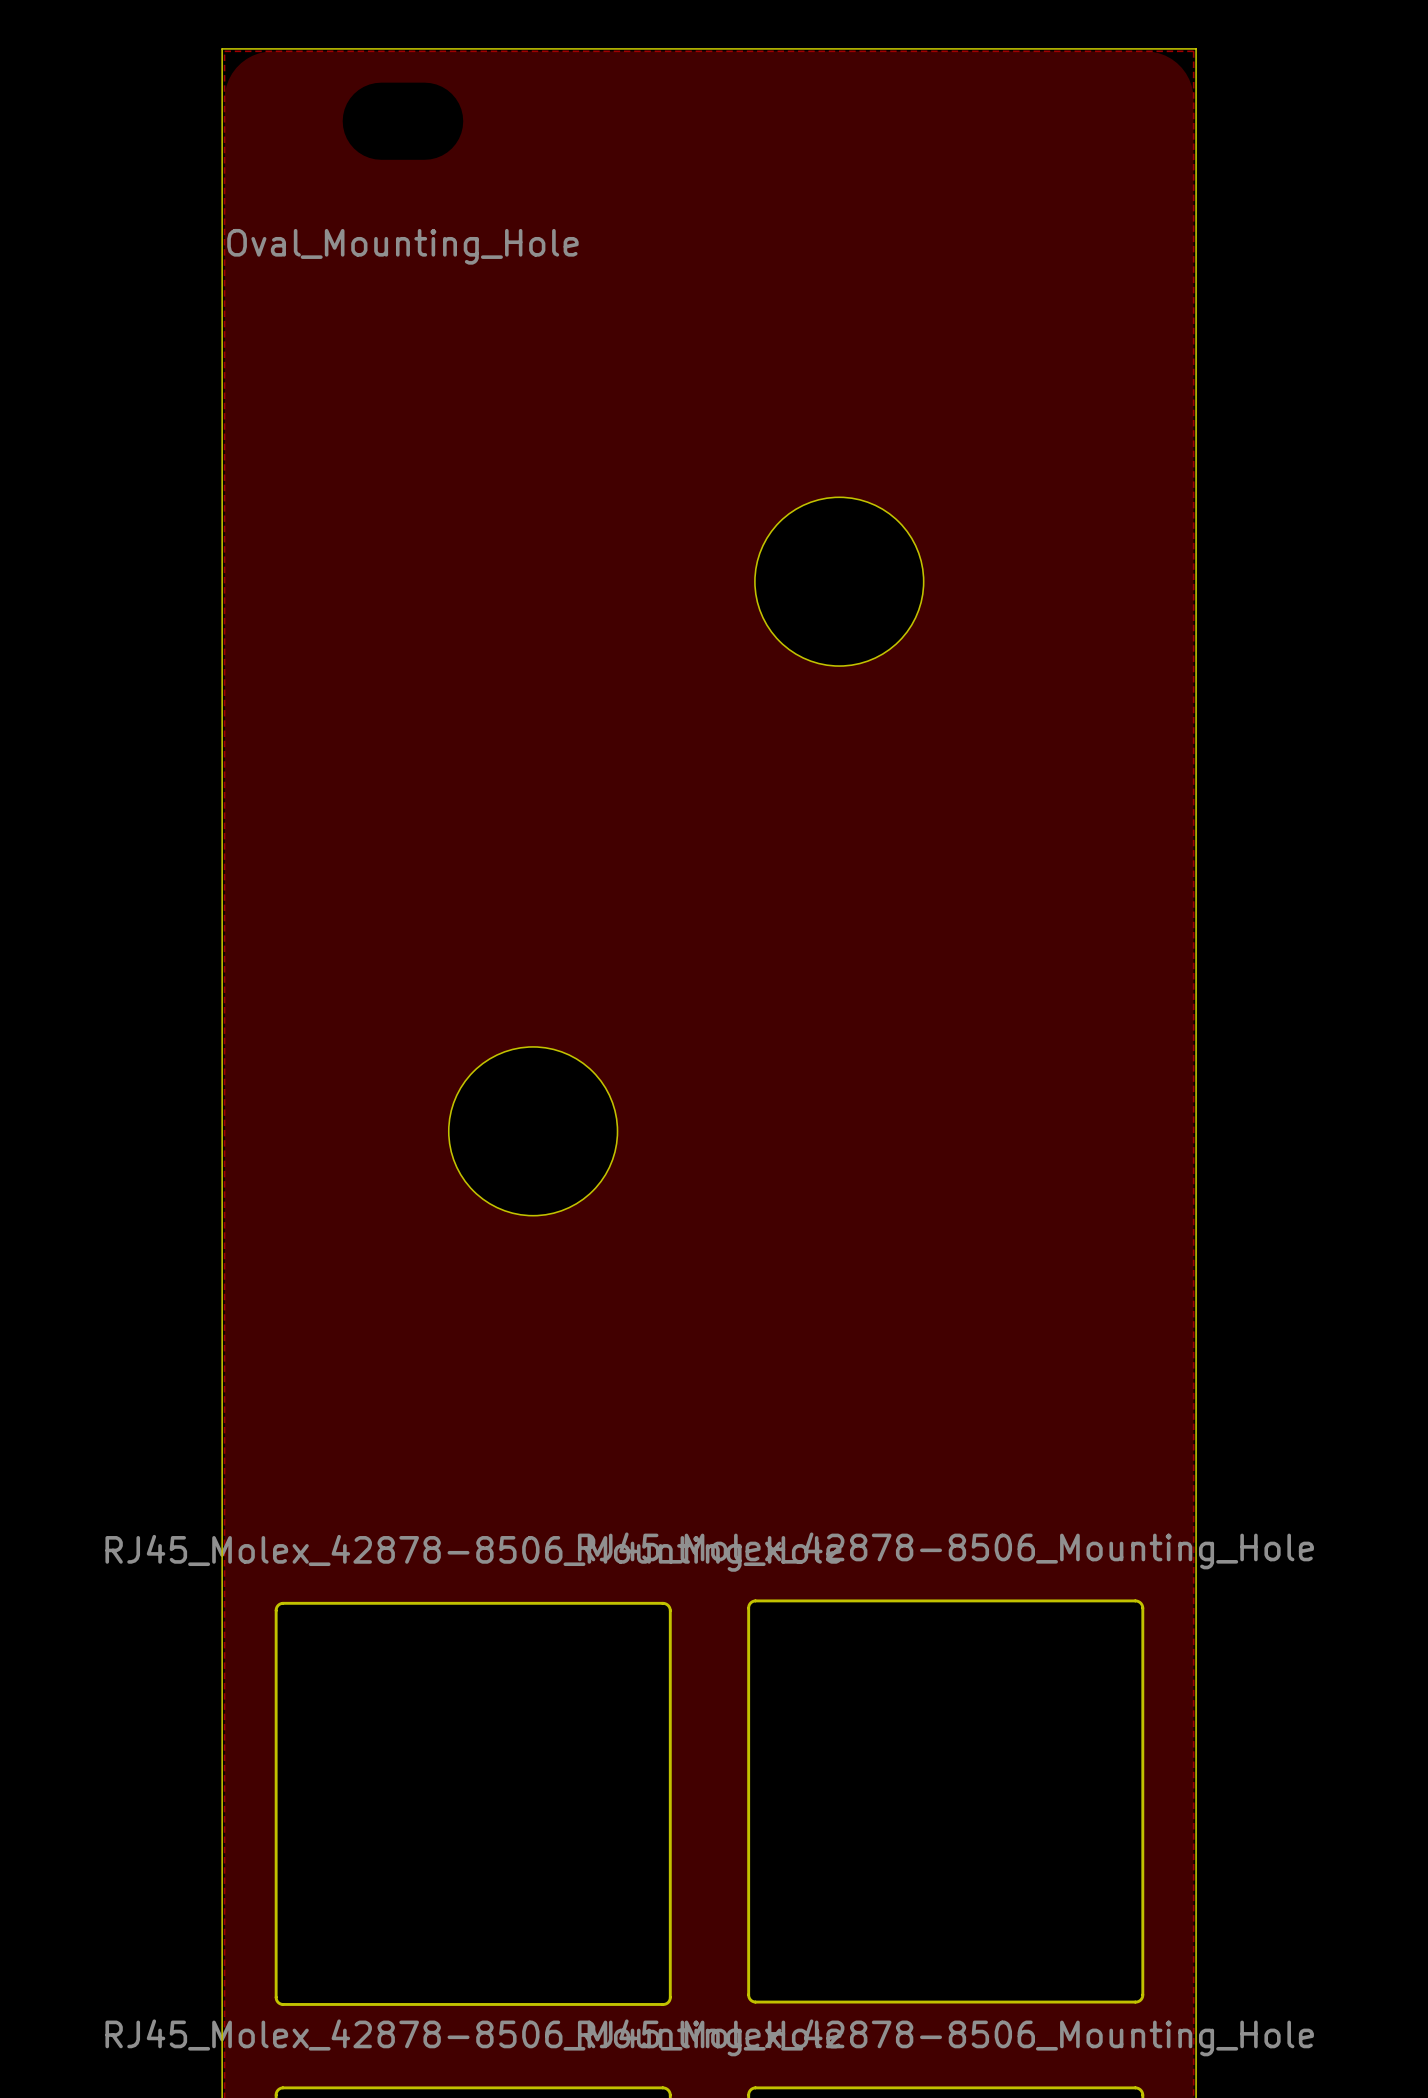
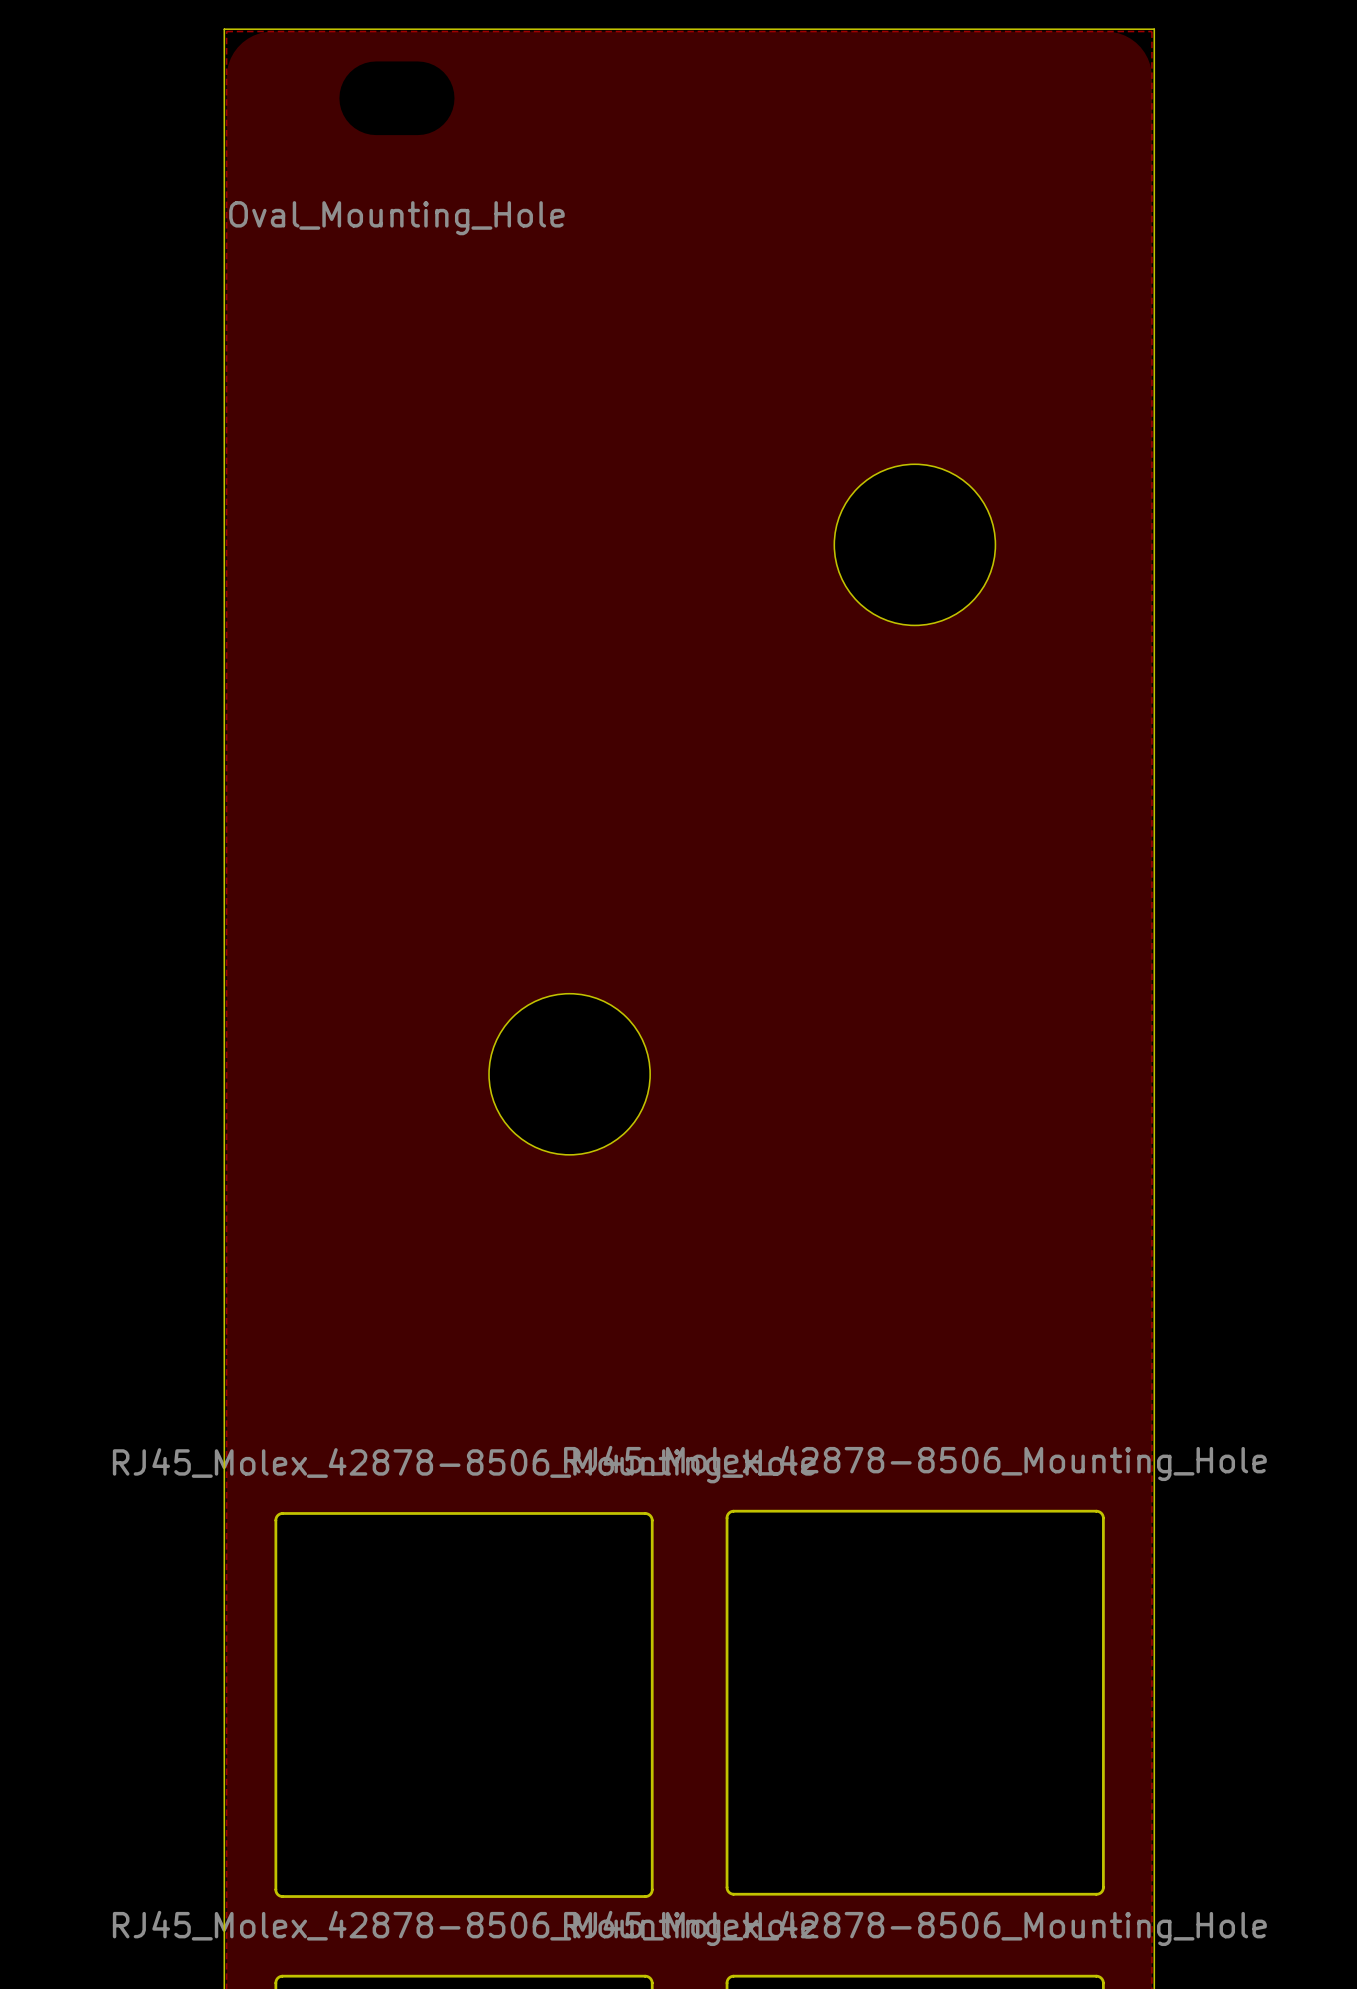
part position: (839, 581) -> (914, 544)
part position: (533, 1131) -> (569, 1074)

